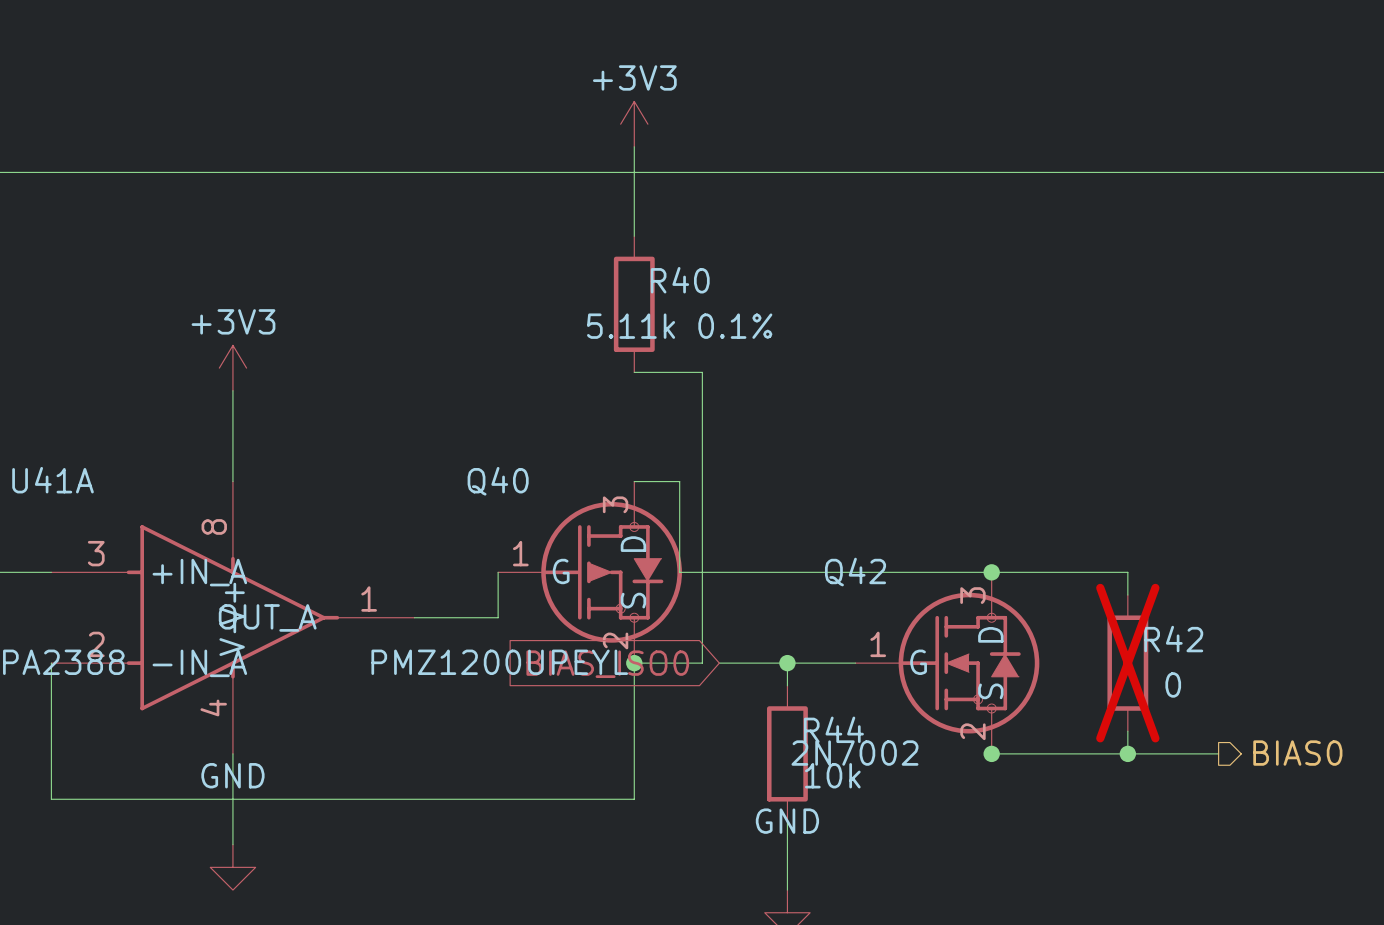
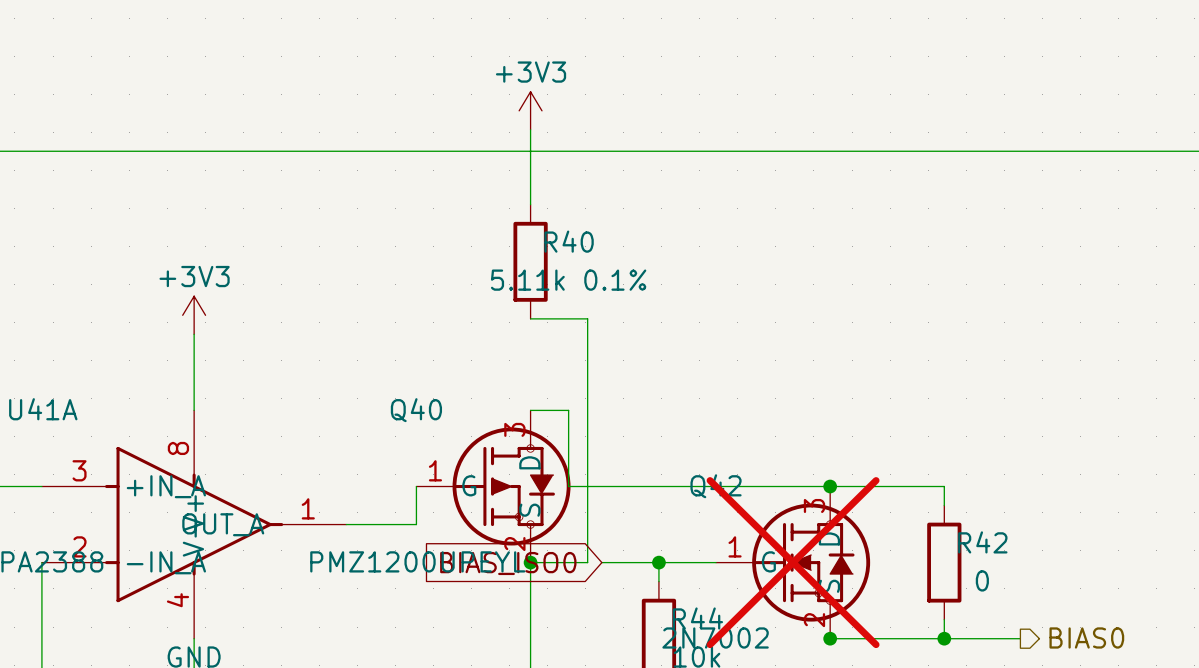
Q42 do-not-place cross: none -> (793, 562)
R42 do-not-place cross: (1127, 663) -> none

